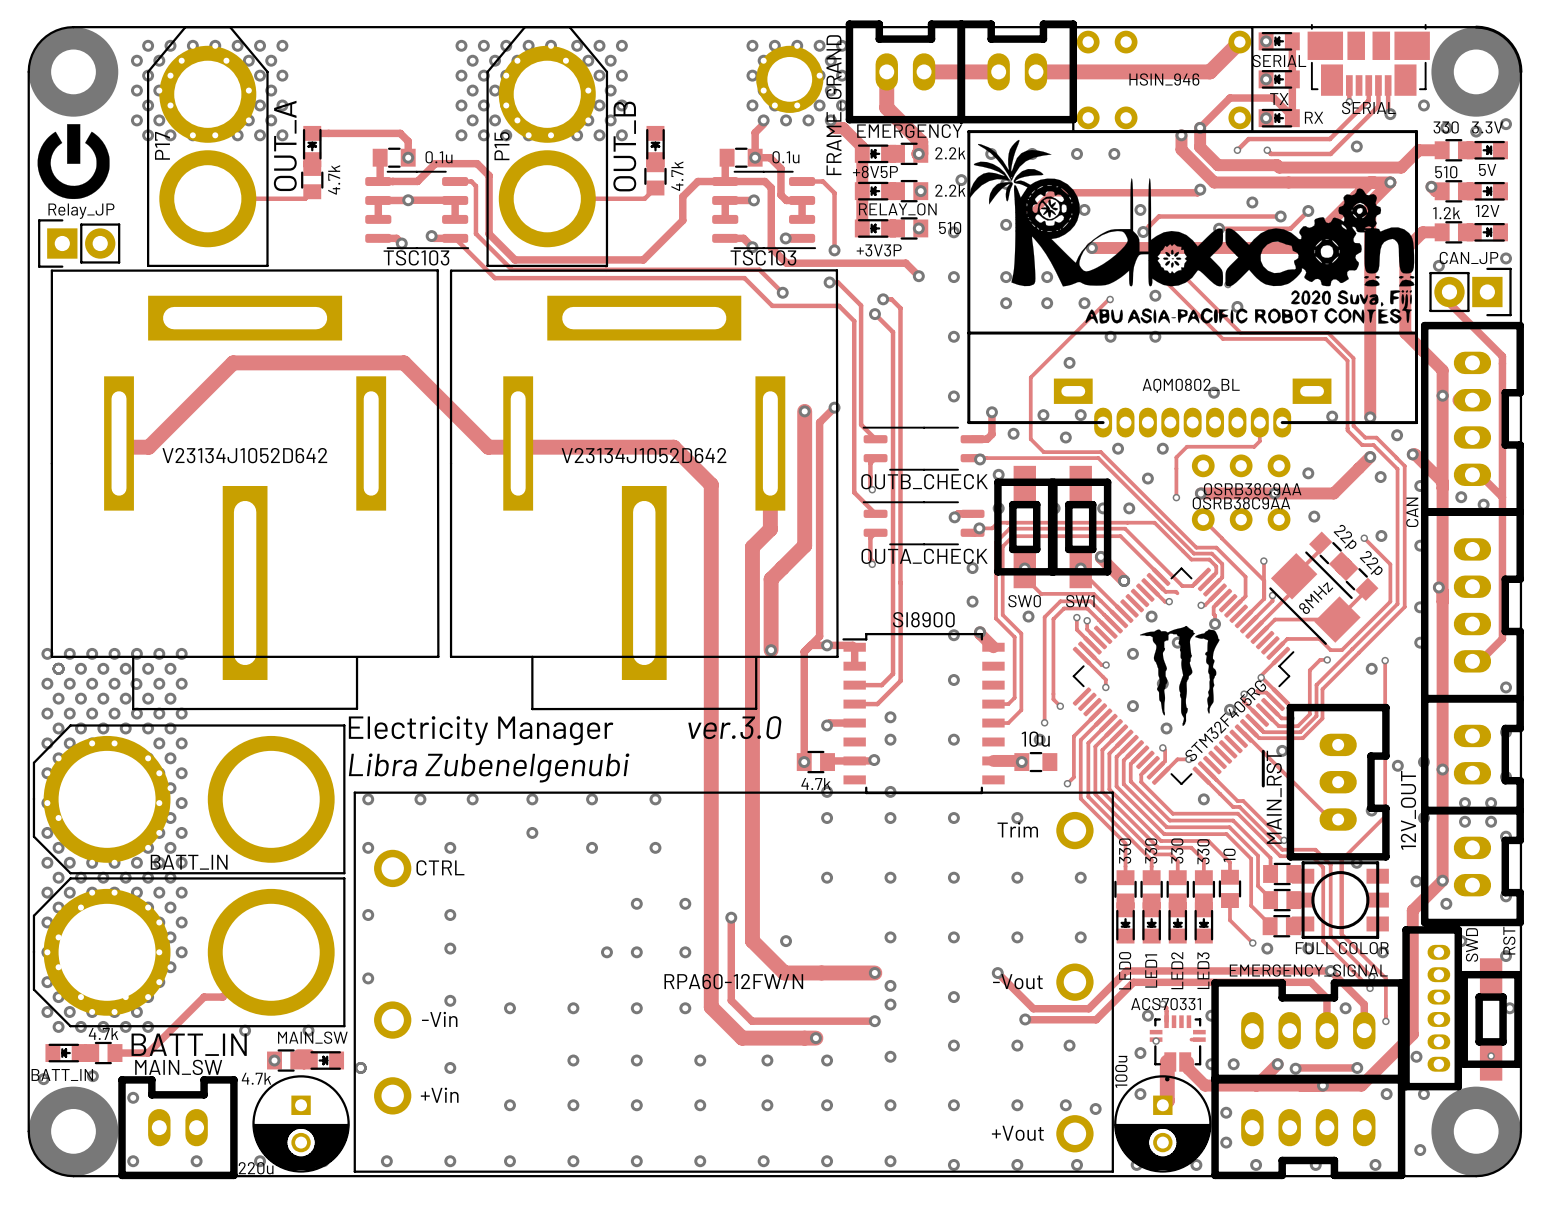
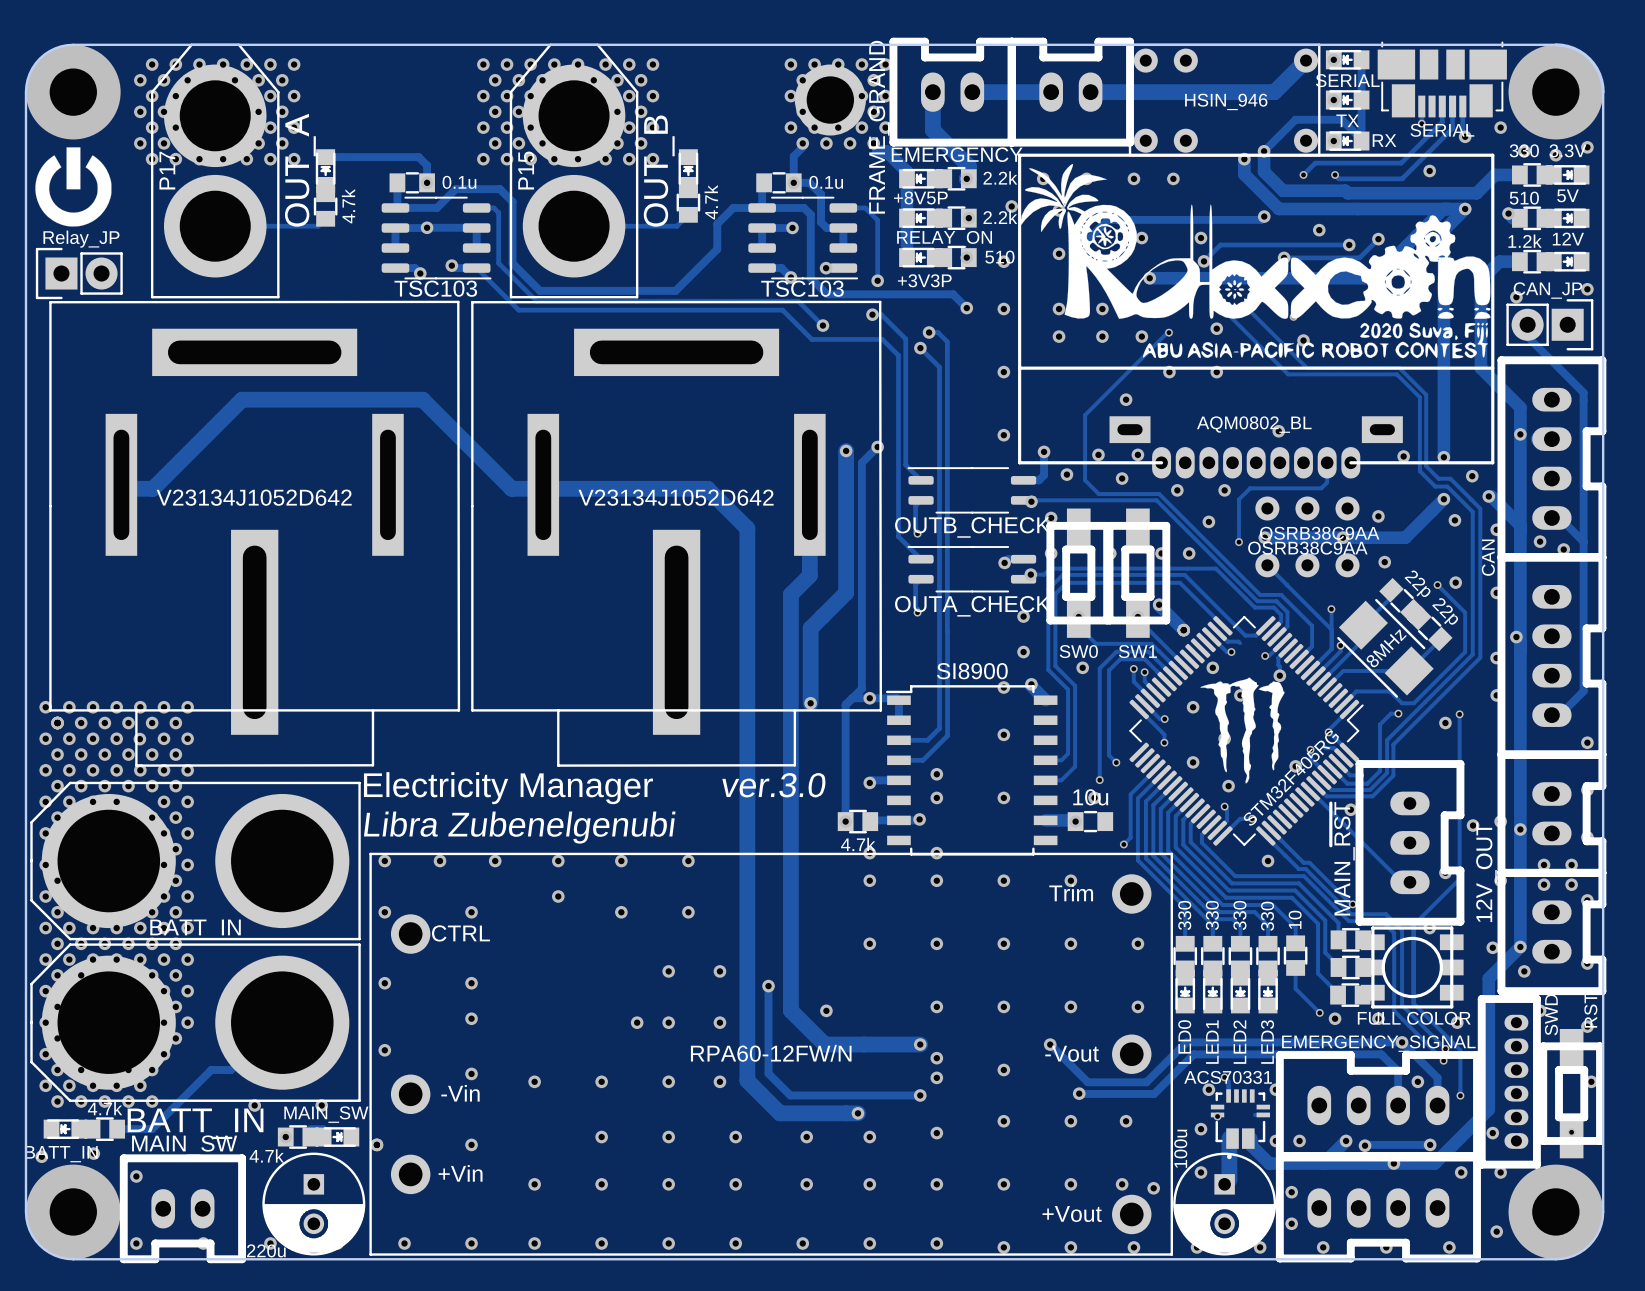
part rotation: 0° (177, 1127) -> 180° (182, 1208)

